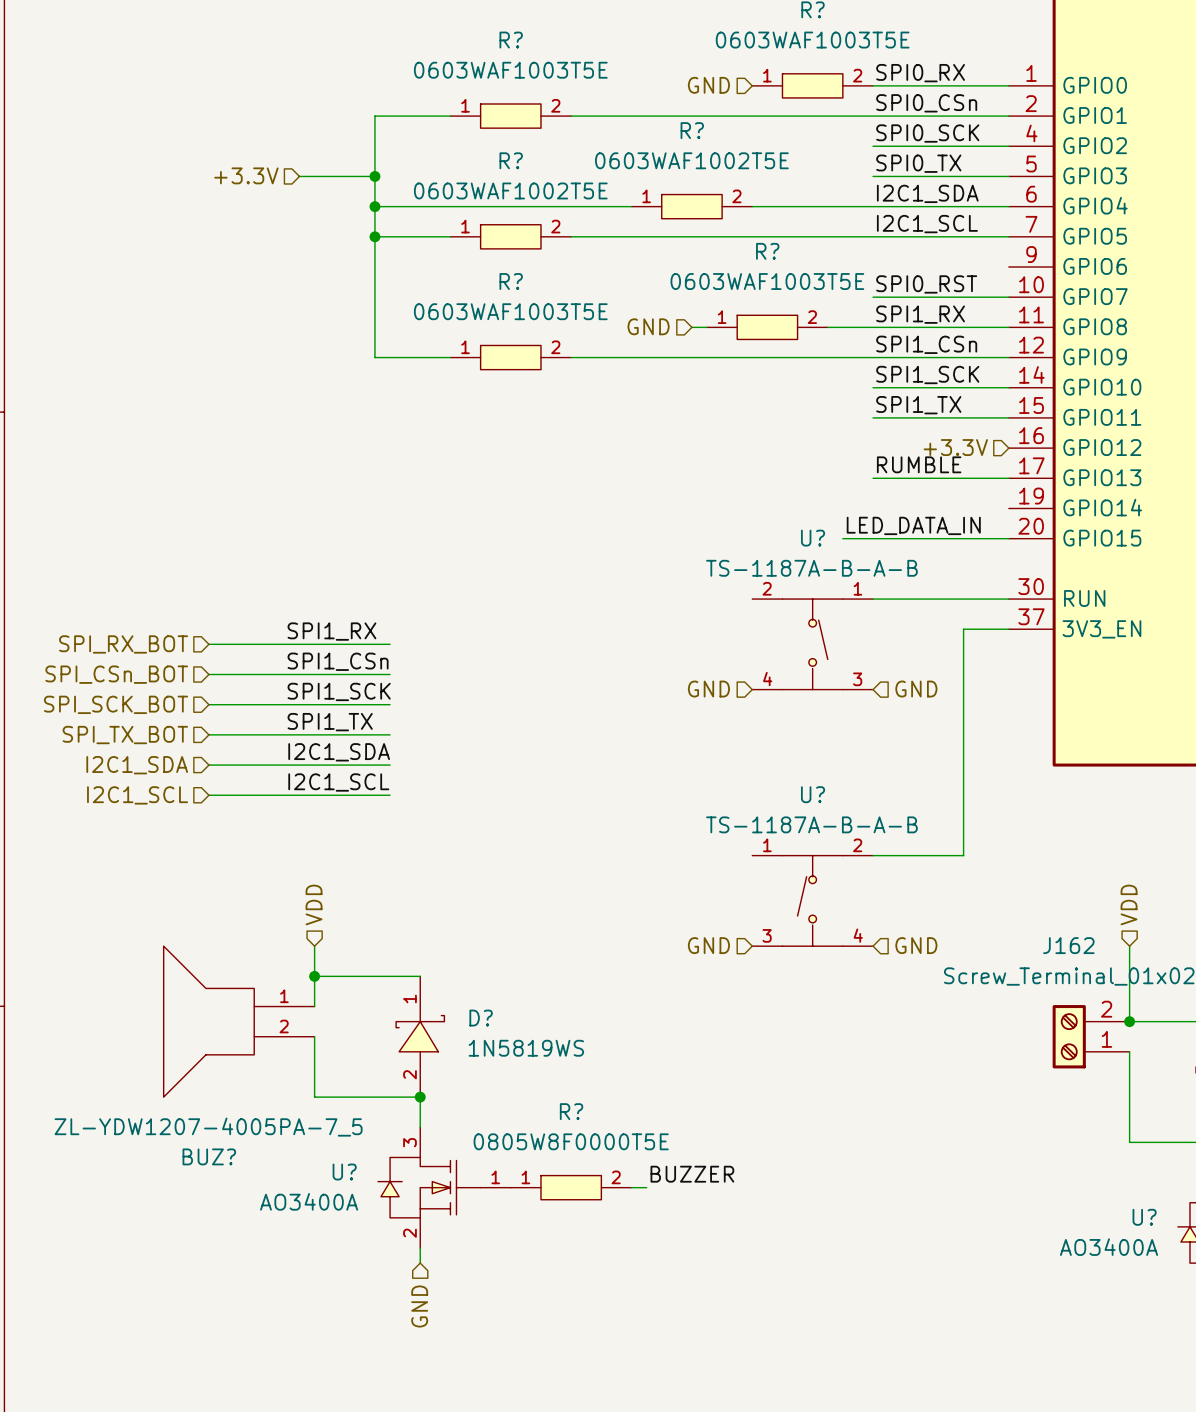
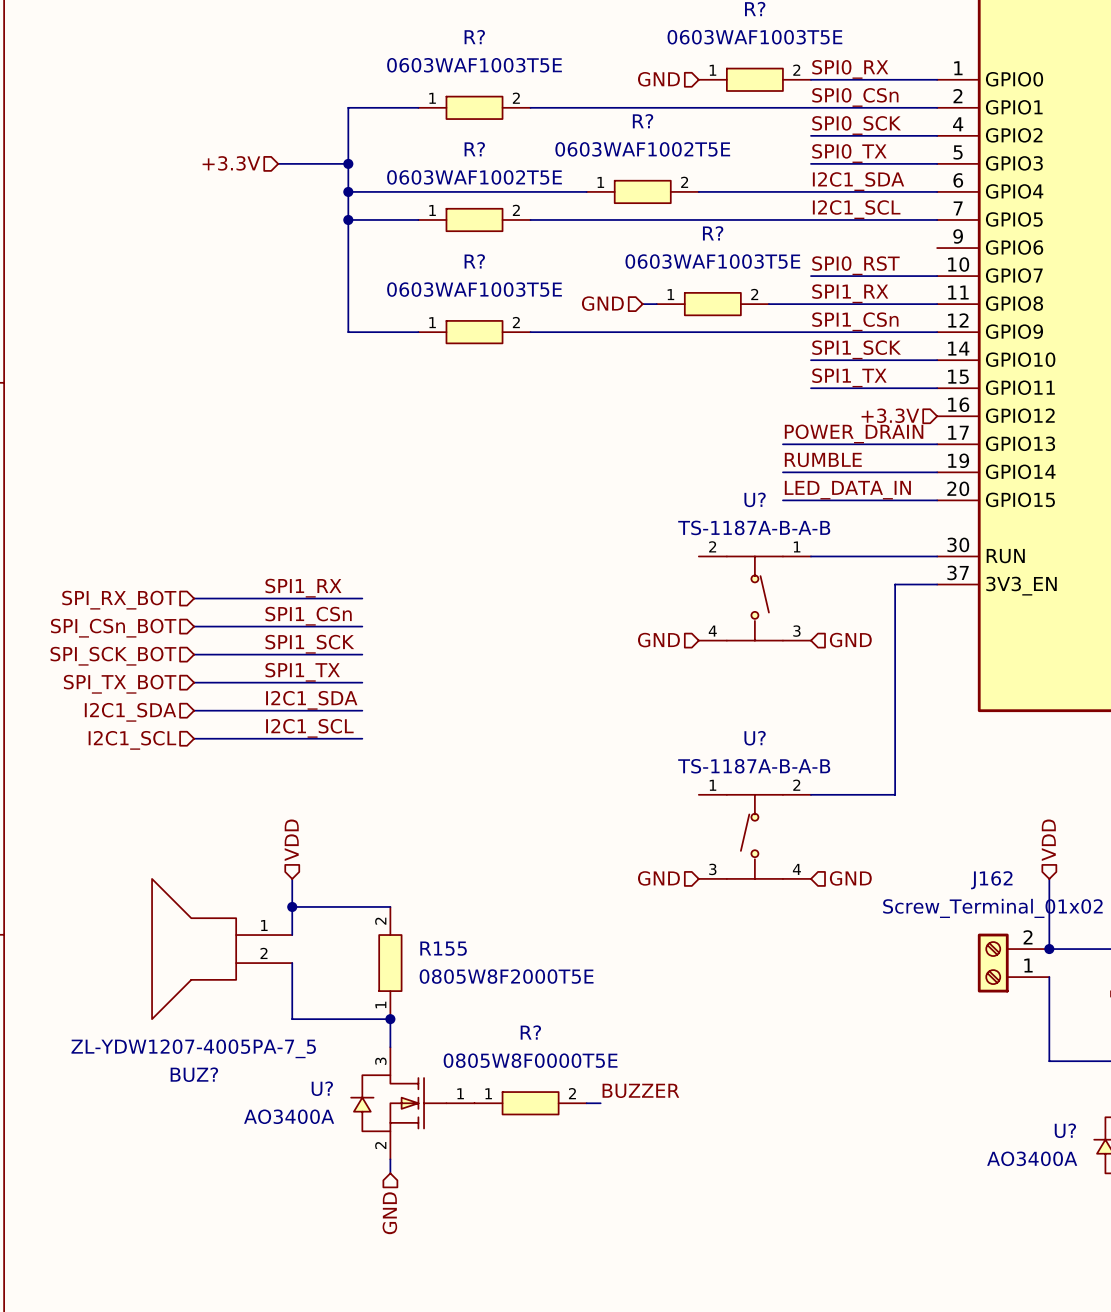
label position: RUMBLE (919, 464) -> RUMBLE (823, 459)
label: none -> POWER_DRAIN (854, 433)
wire: none -> (782, 444) (810, 444)
wire: none -> (782, 472) (937, 472)
D?: 1N5819WS (420, 1036) -> none
R155: none -> 0805W8F2000T5E (390, 963)

